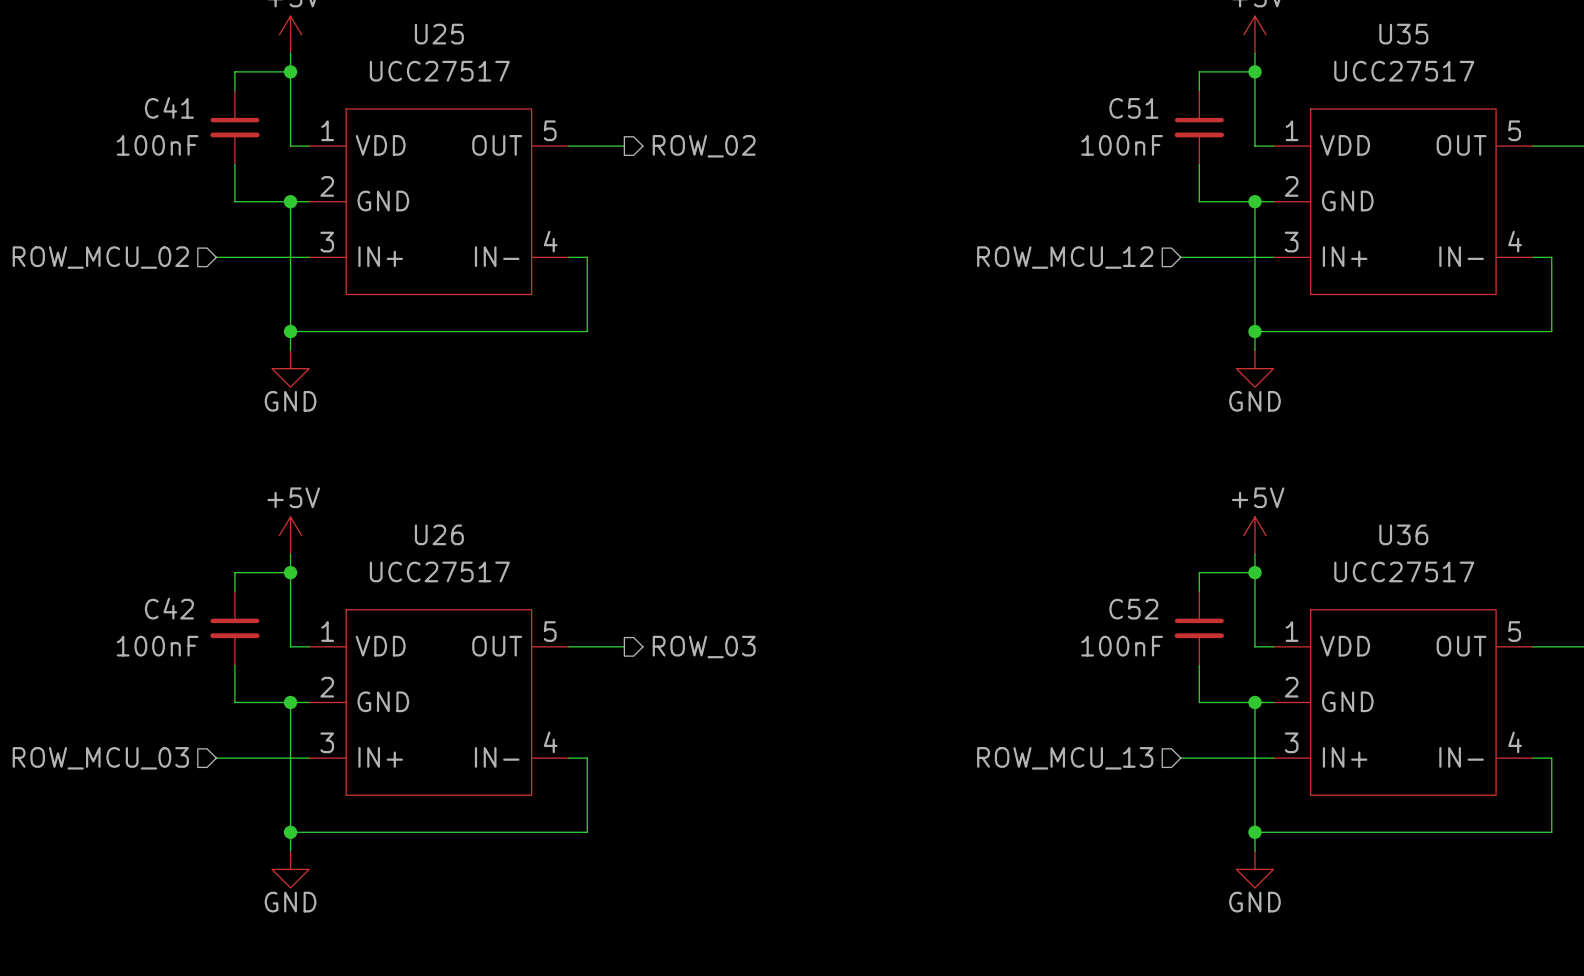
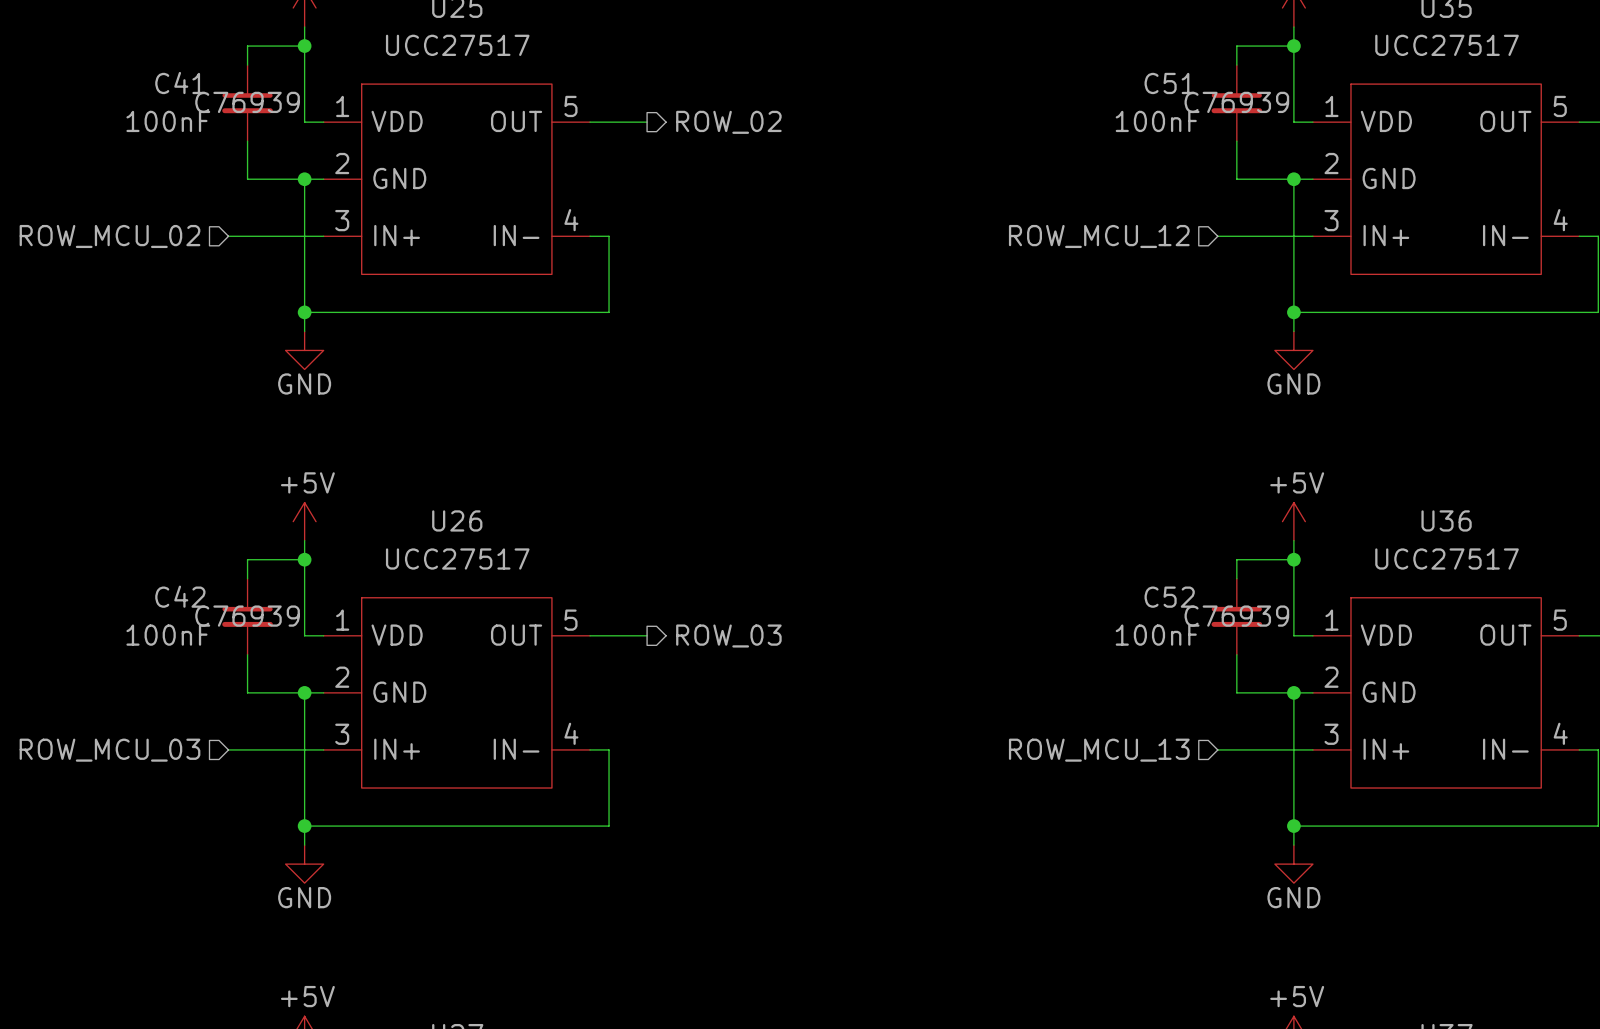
C41 text: none -> C76939 (247, 102)
C51 text: none -> C76939 (1236, 102)
C42 text: none -> C76939 (247, 616)
C52 text: none -> C76939 (1236, 616)

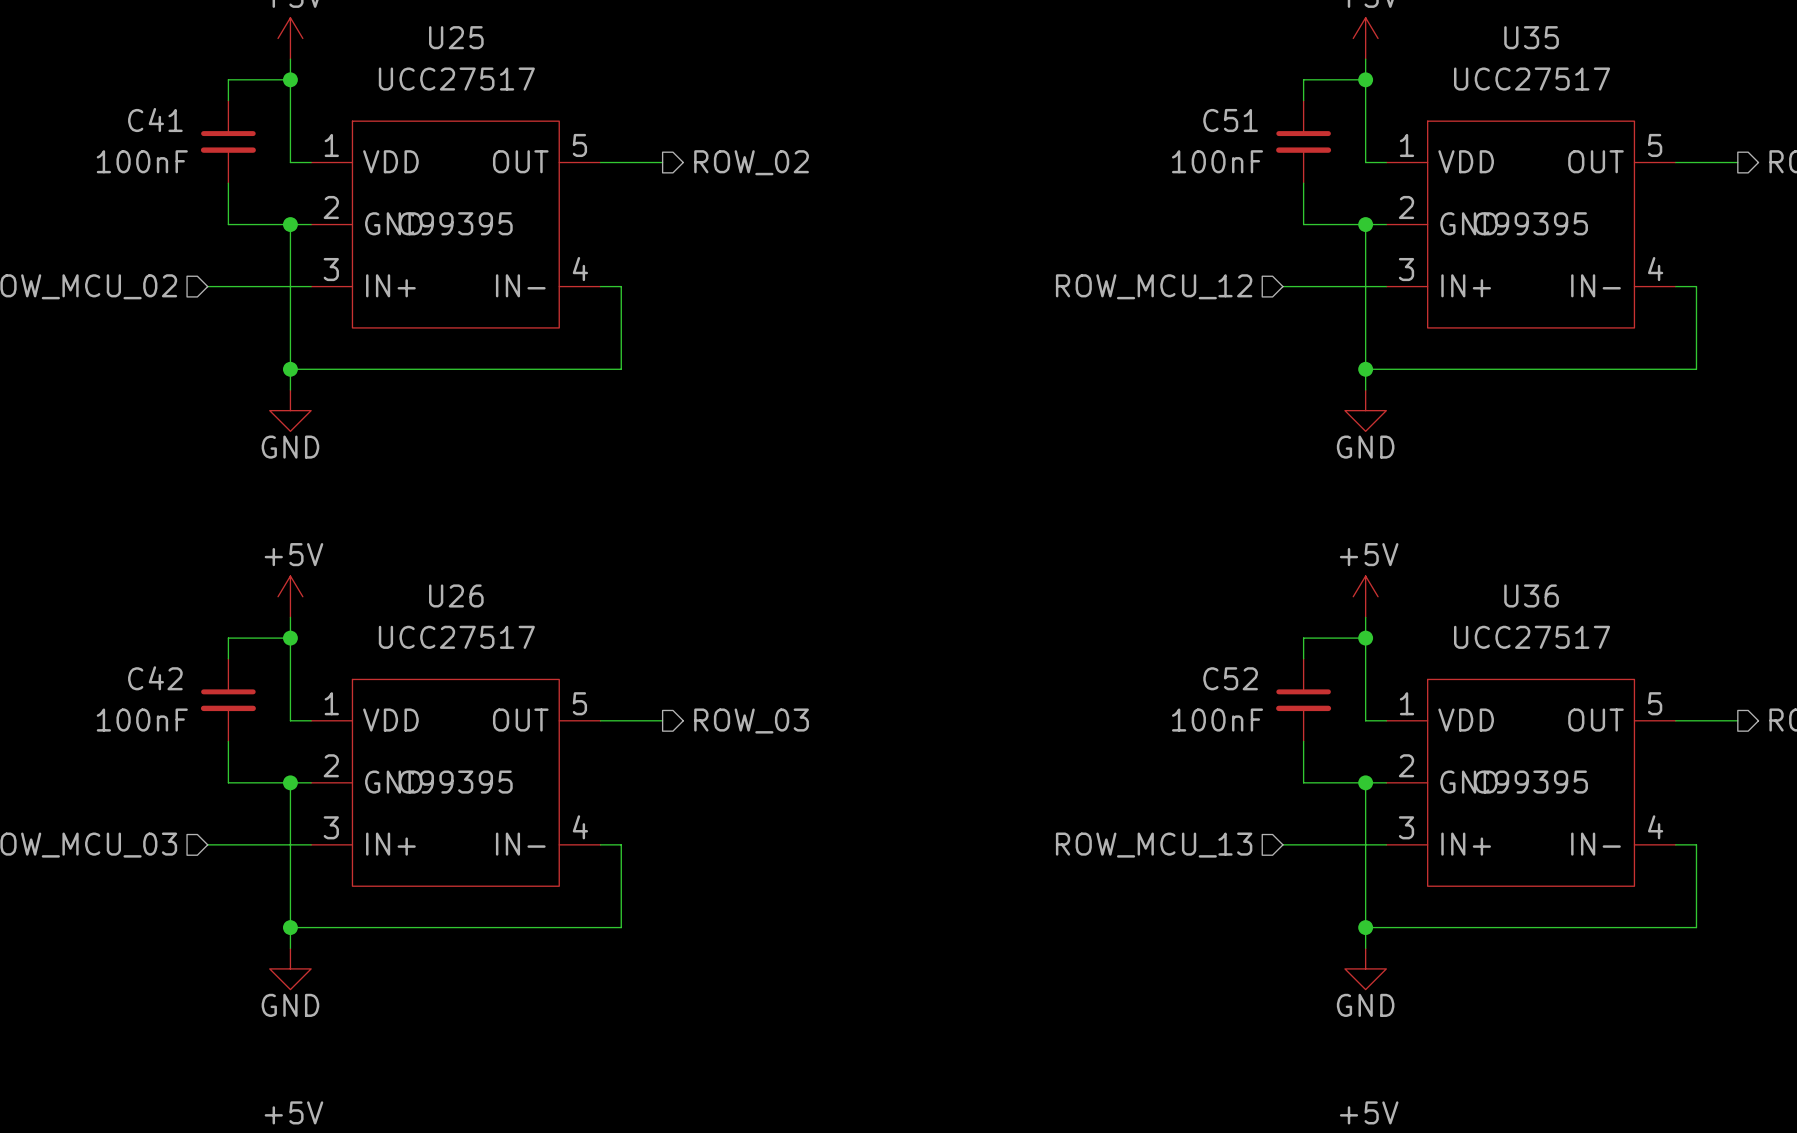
C41 text: C76939 (247, 102) -> none
C51 text: C76939 (1236, 102) -> none
U25 text: none -> C99395 (455, 223)
U35 text: none -> C99395 (1531, 223)
C42 text: C76939 (247, 616) -> none
C52 text: C76939 (1236, 616) -> none
U26 text: none -> C99395 (455, 782)
U36 text: none -> C99395 (1531, 782)

